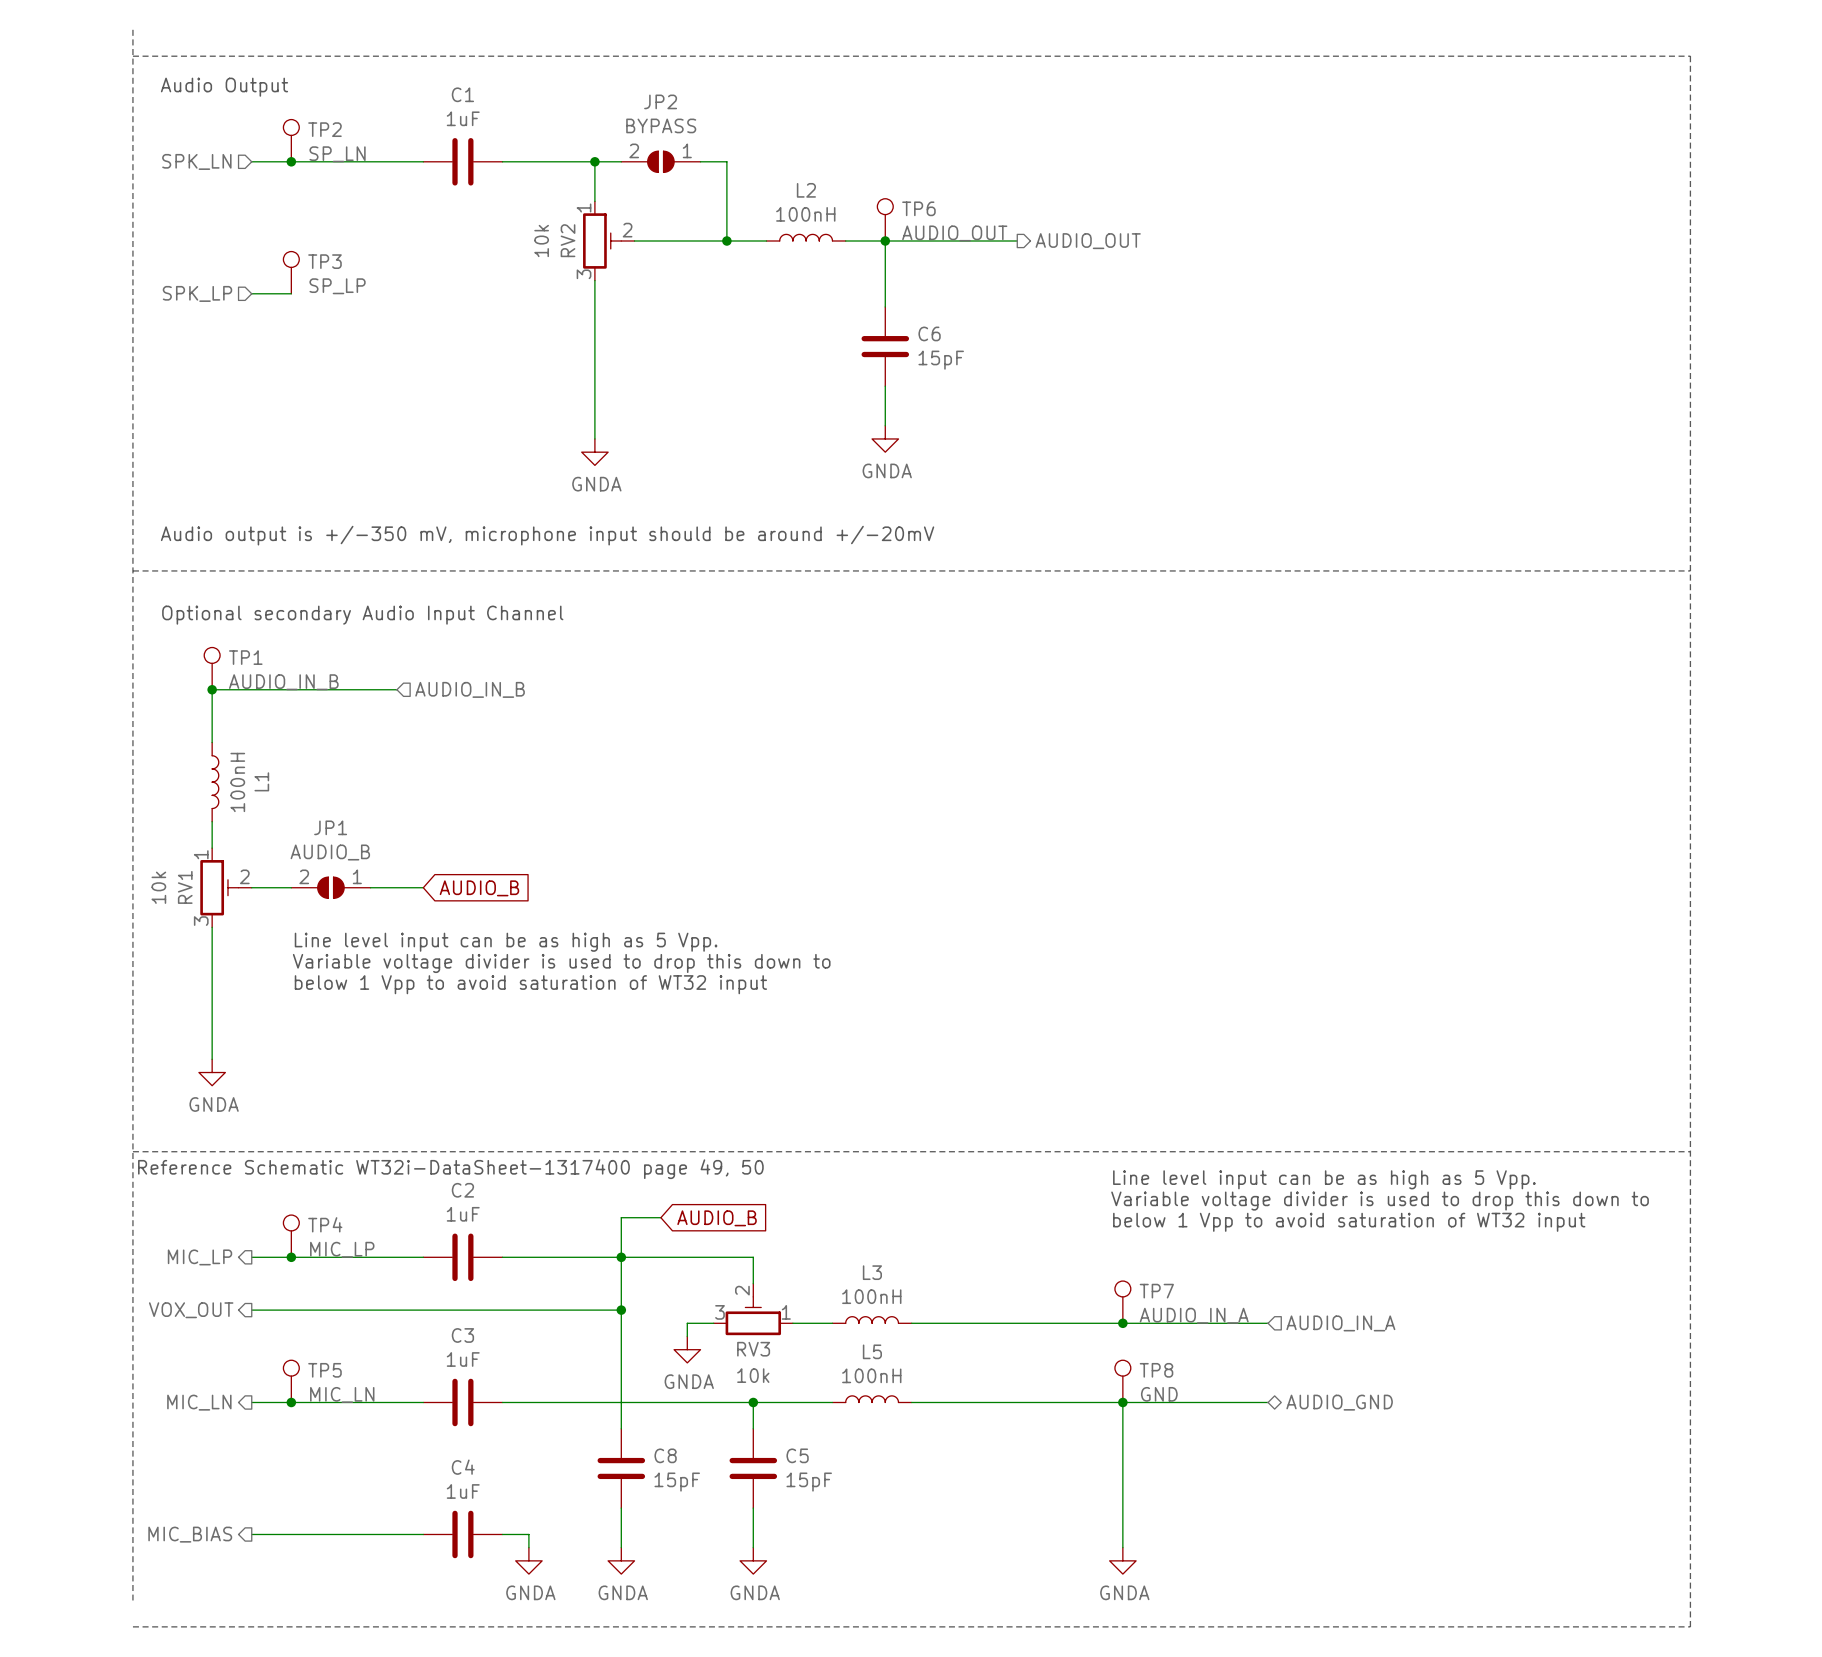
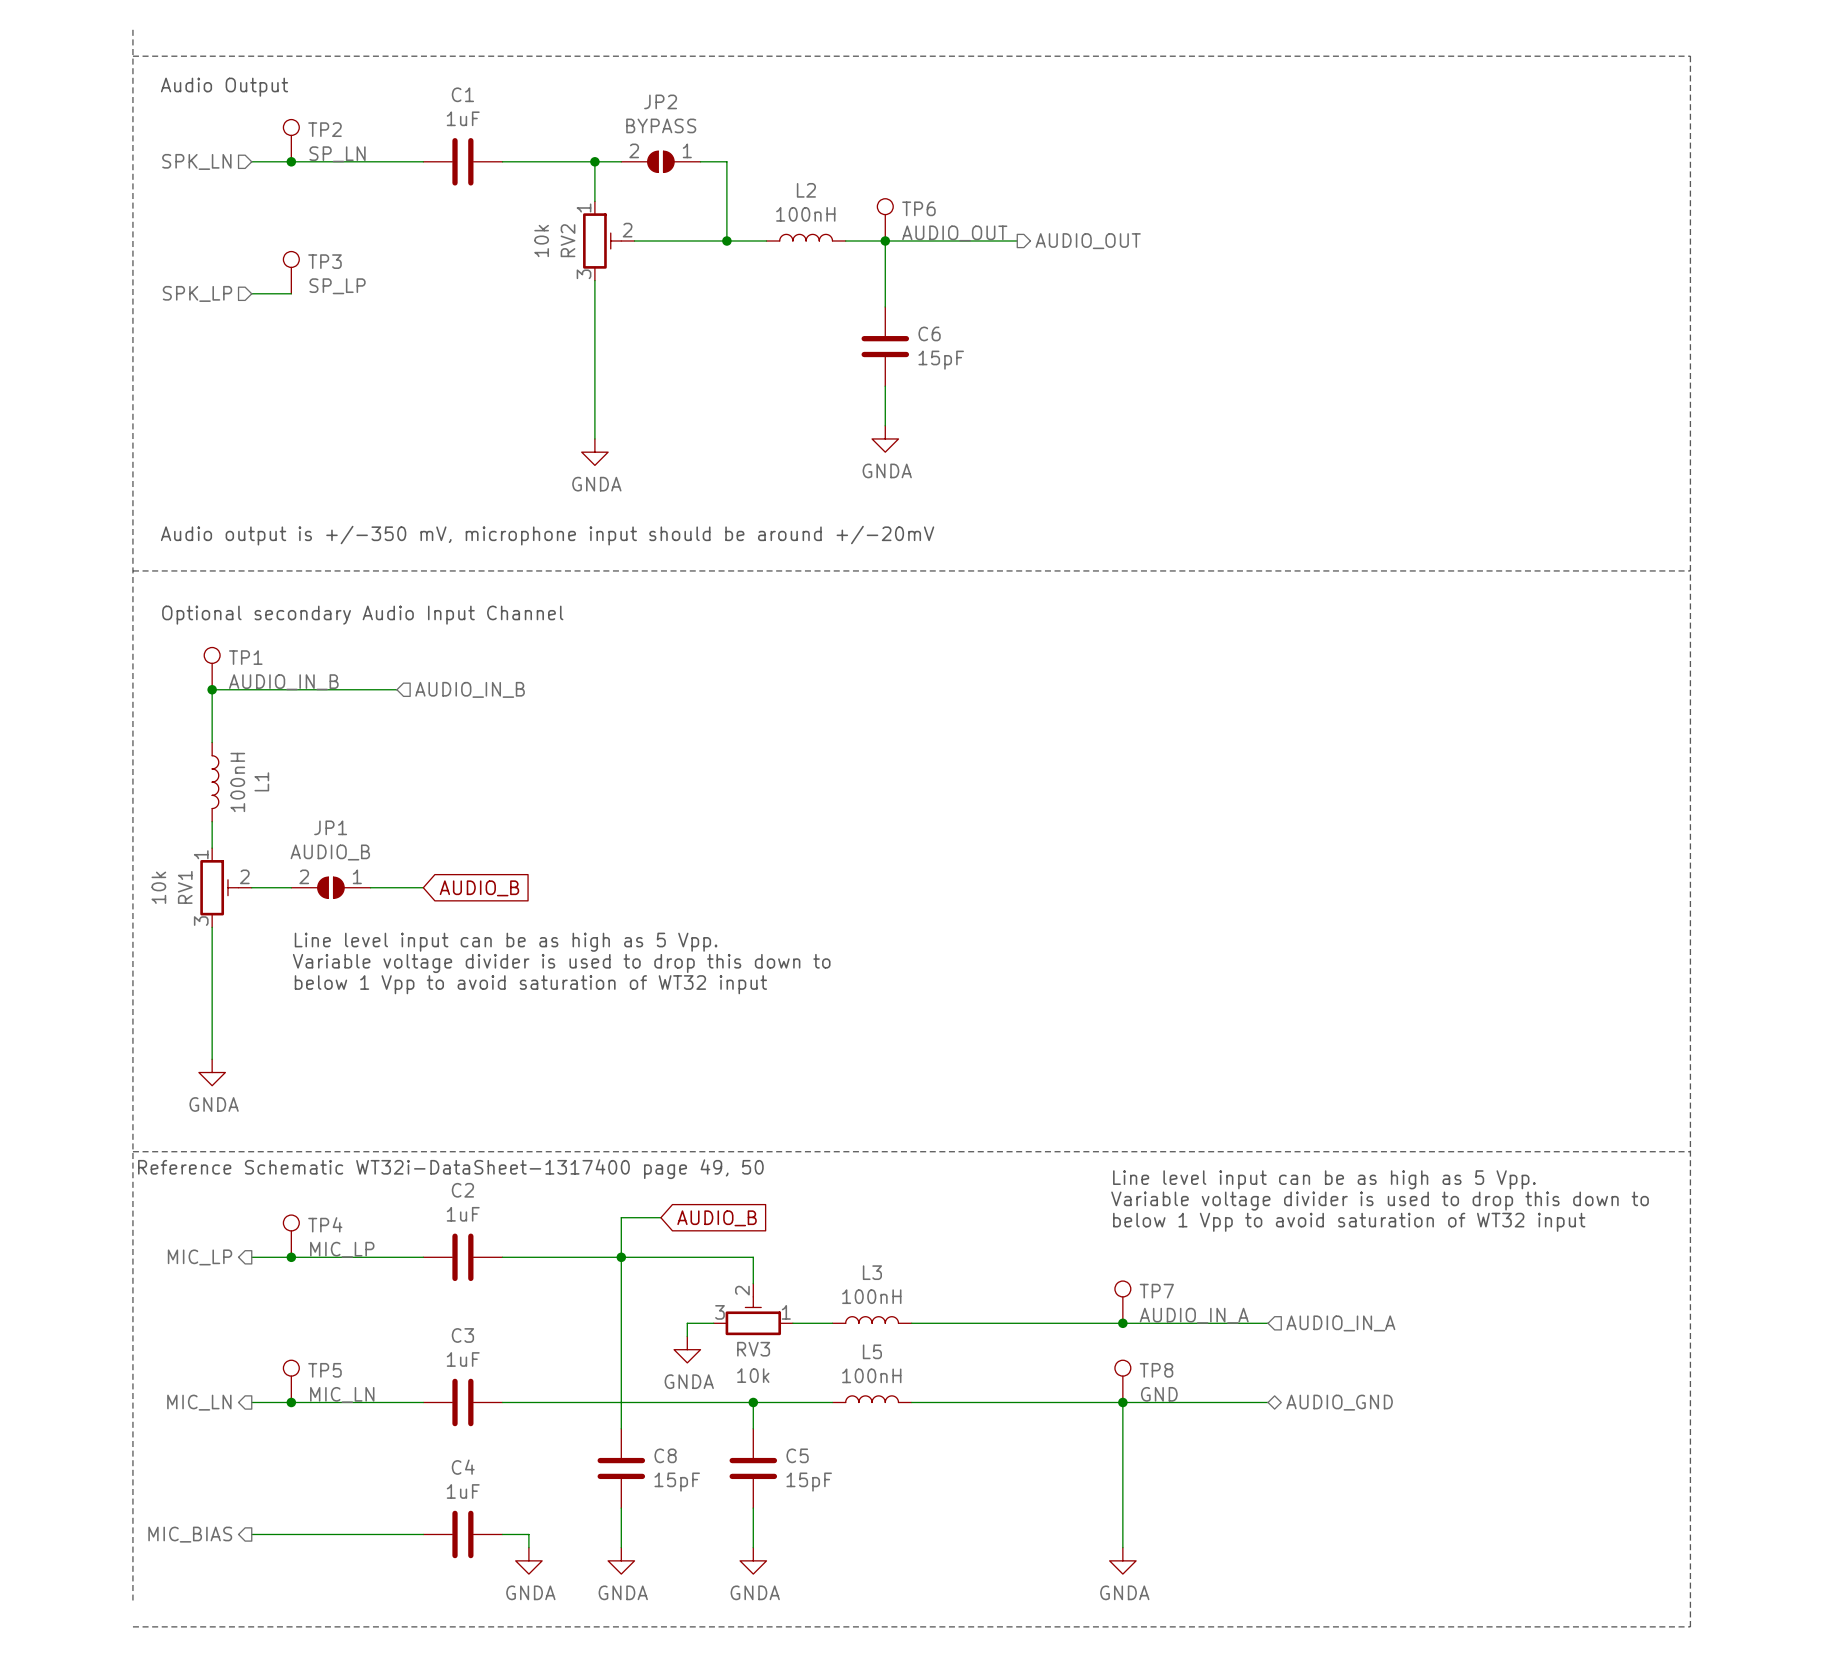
hierarchical label: VOX_OUT (191, 1310) -> none
wire: (251, 1310) (621, 1310) -> none
junction: (621, 1310) -> none

